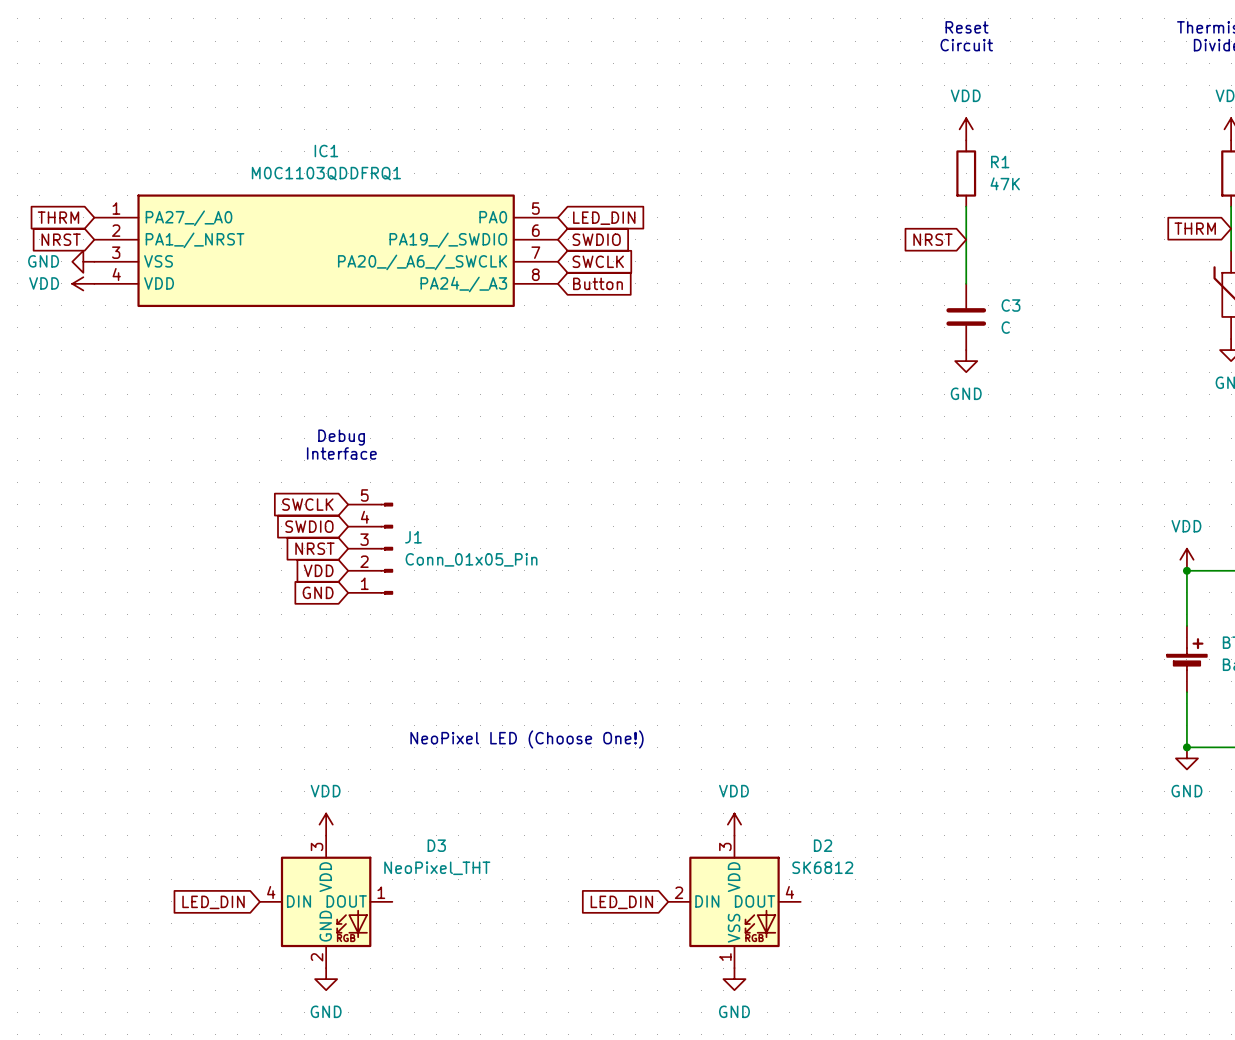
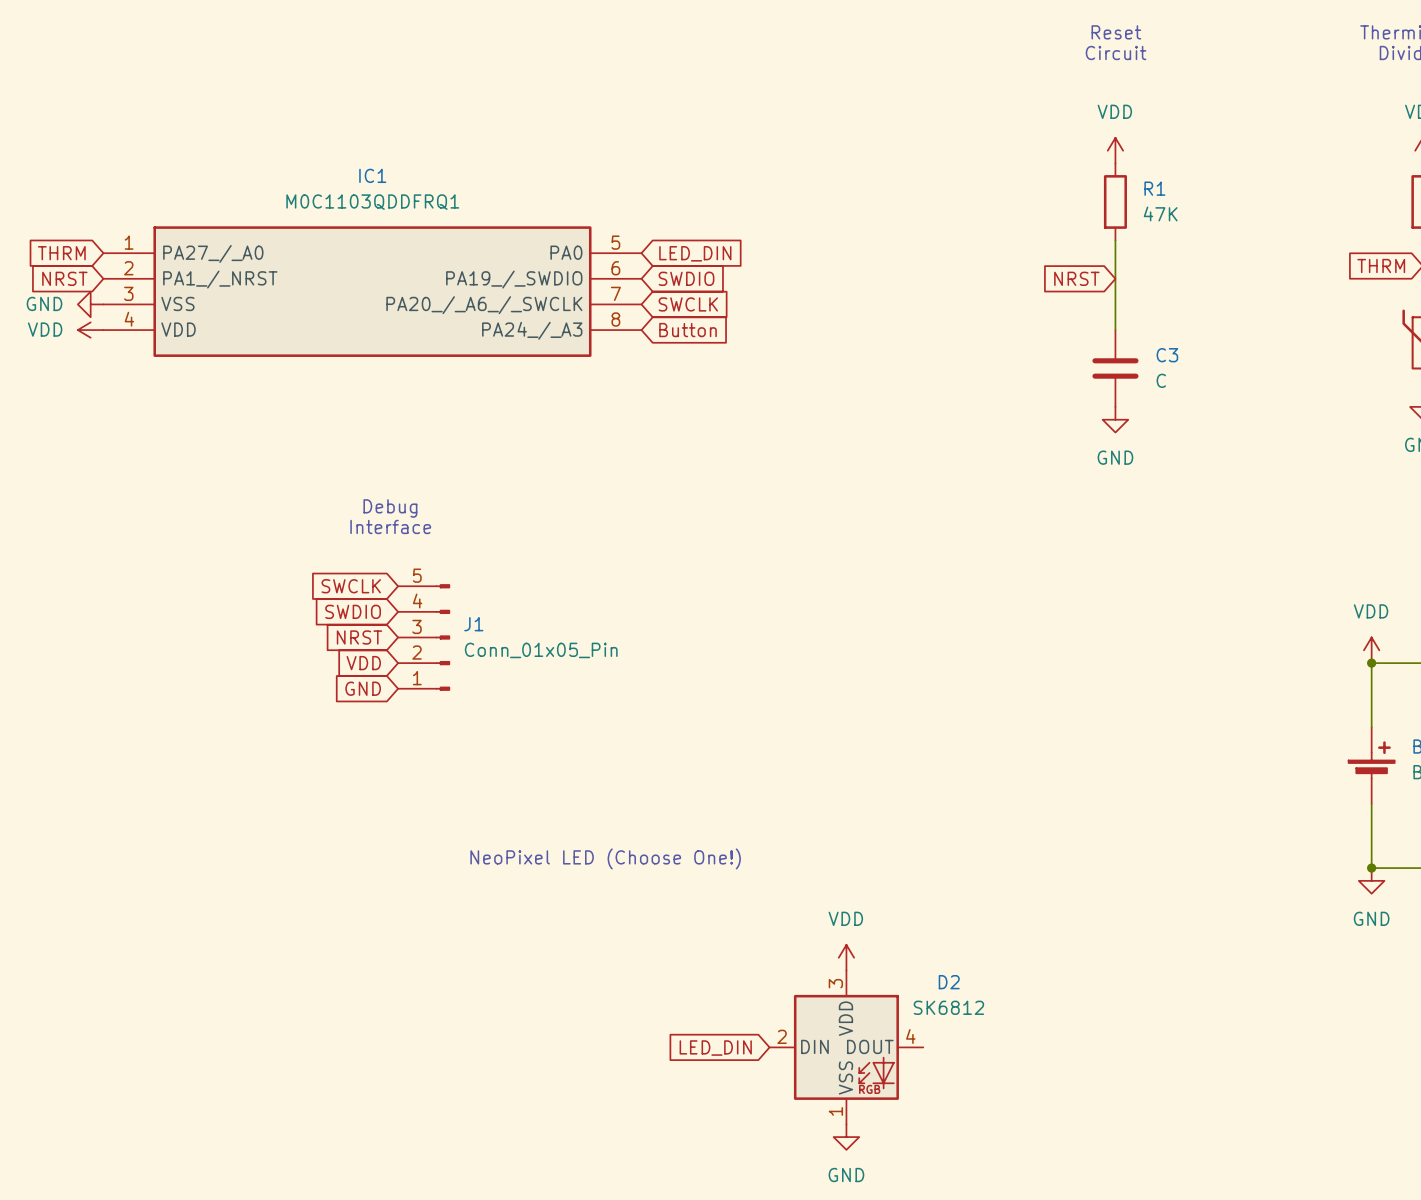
power symbol: VDD (326, 824) -> none
D3: NeoPixel_THT (326, 901) -> none
global label: LED_DIN (213, 902) -> none
power symbol: GND (326, 979) -> none

